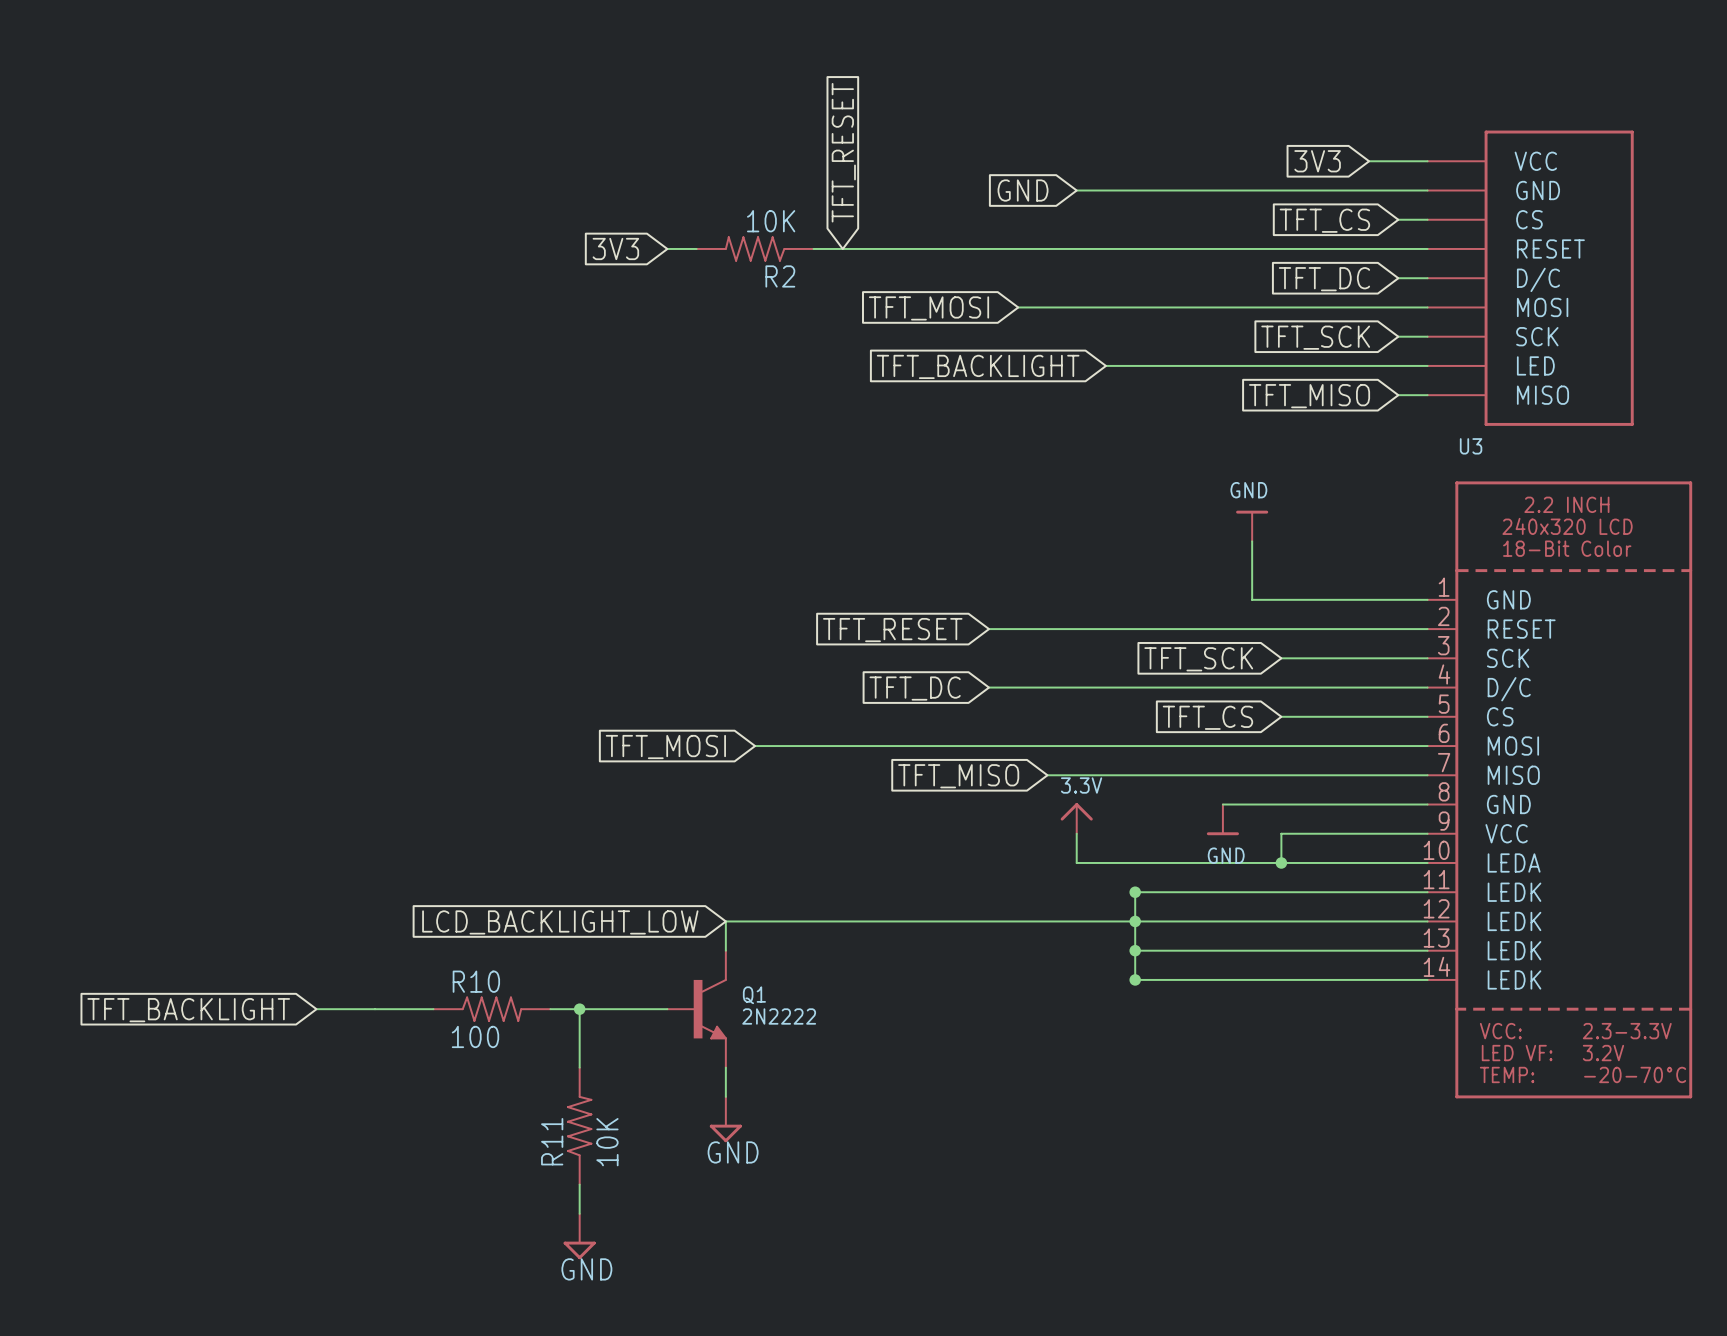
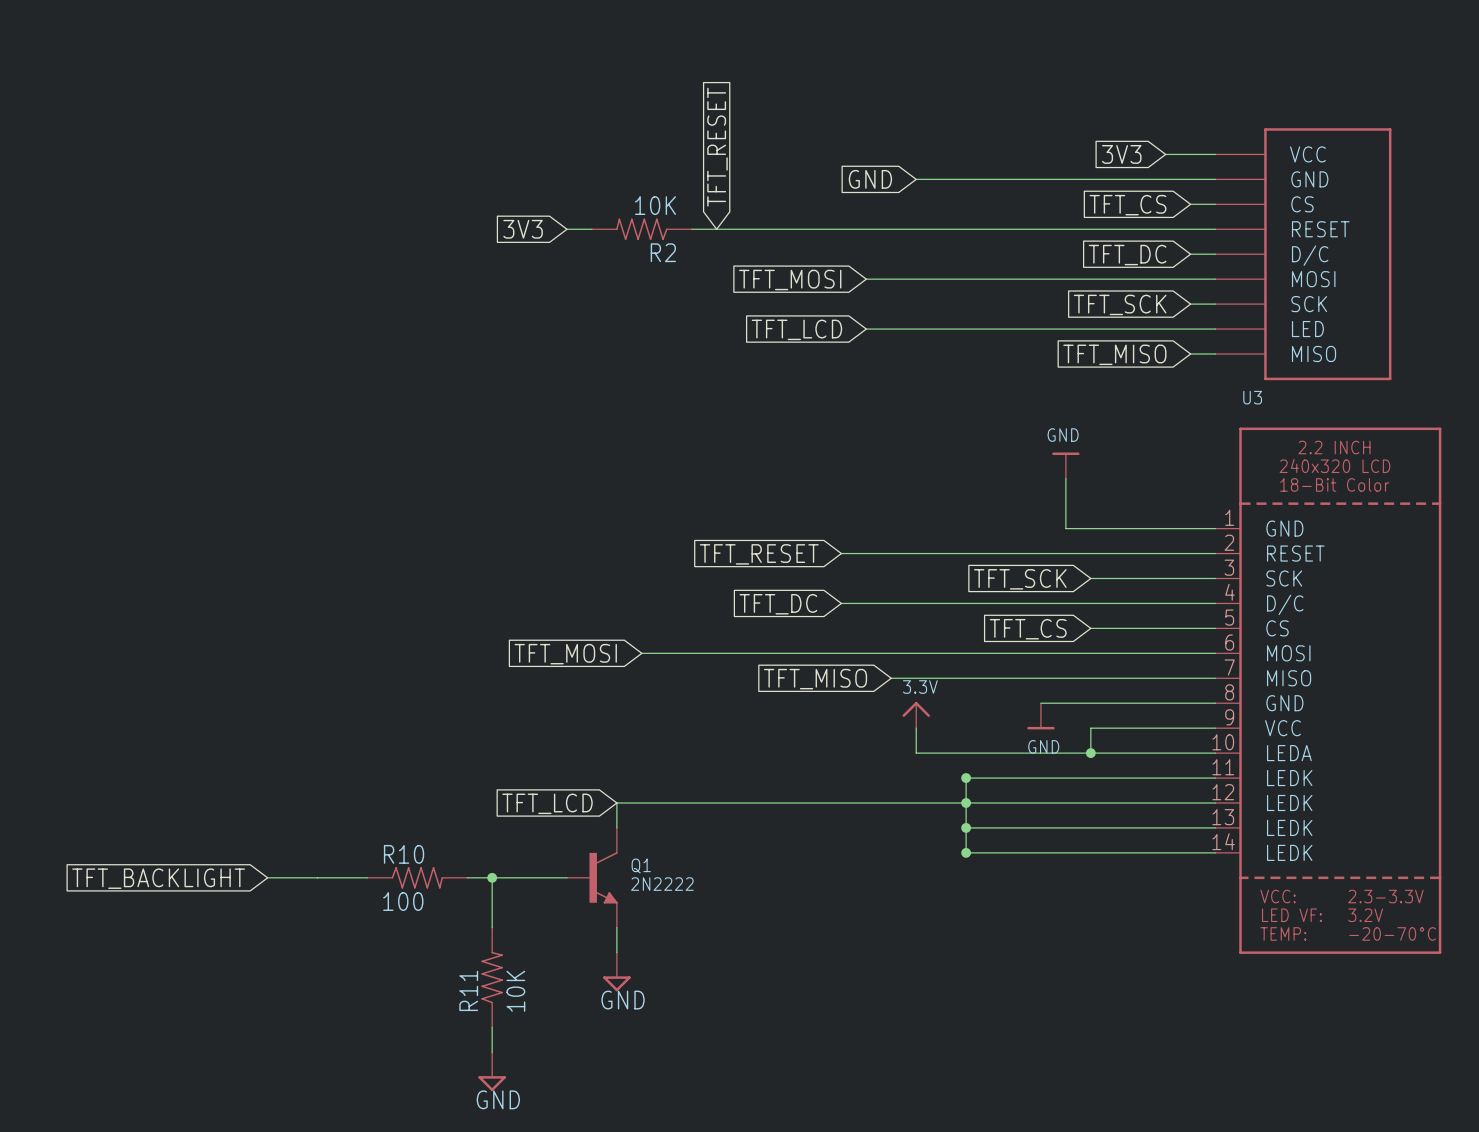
wire: none -> (866, 329) (941, 329)
global label: none -> TFT_LCD (796, 329)
global label: TFT_BACKLIGHT (978, 366) -> none
global label: LCD_BACKLIGHT_LOW (560, 922) -> TFT_LCD (547, 803)

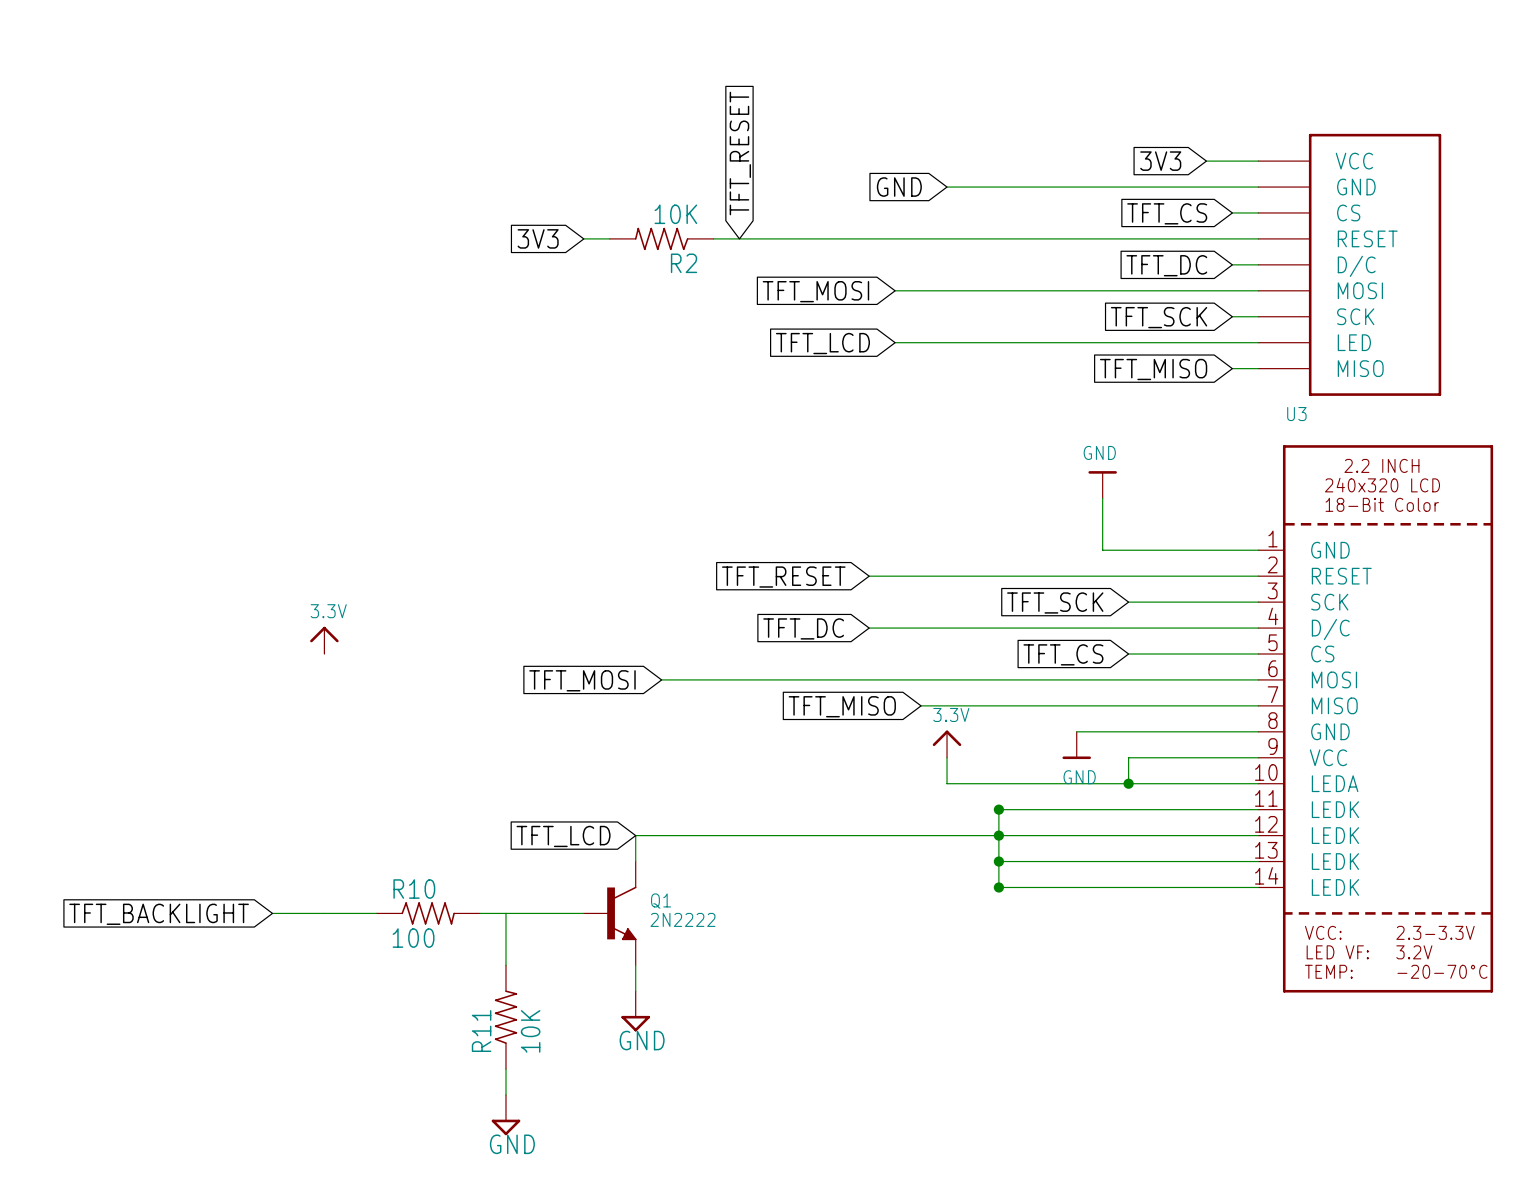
power symbol: none -> 3.3V (324, 640)
junction: (492, 877) -> none

